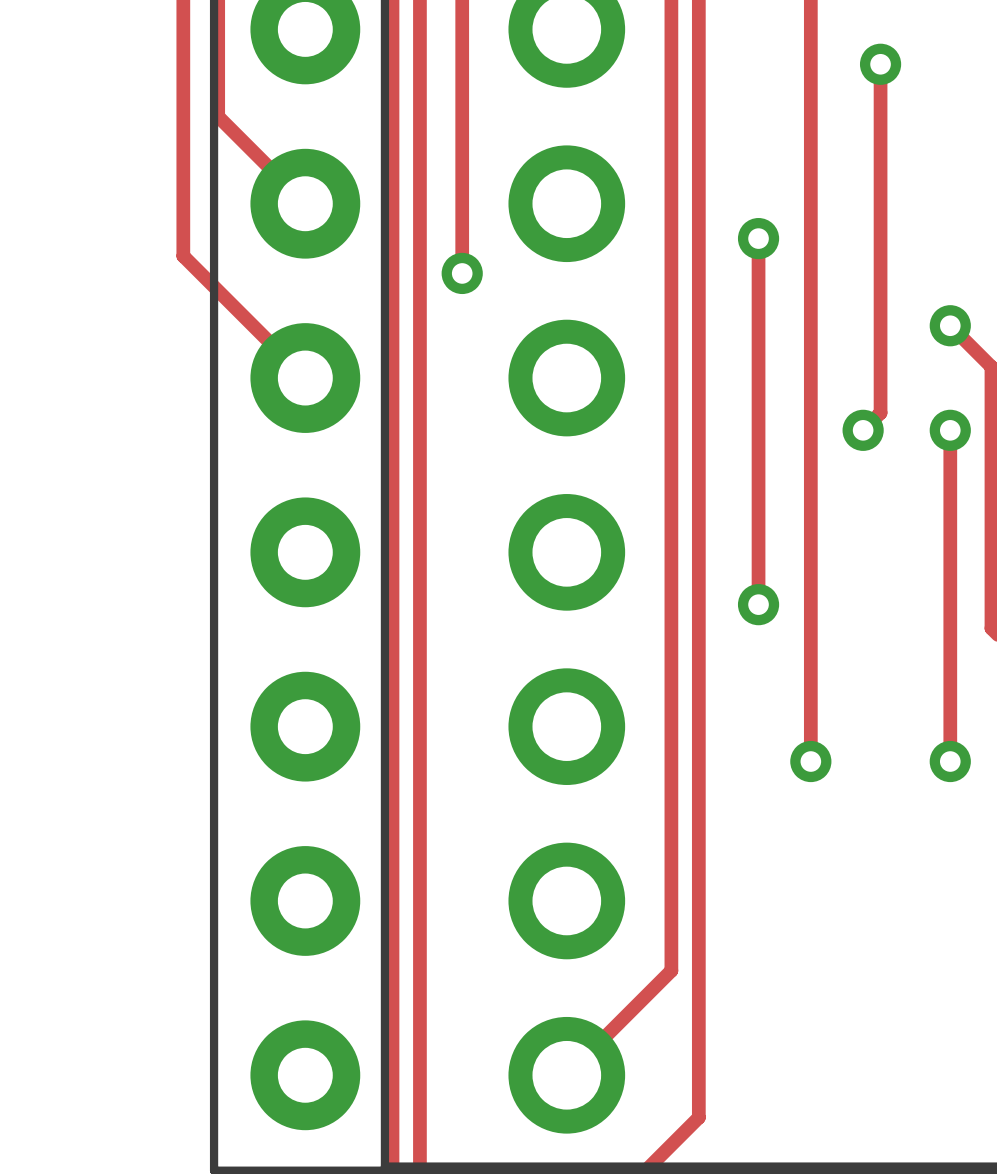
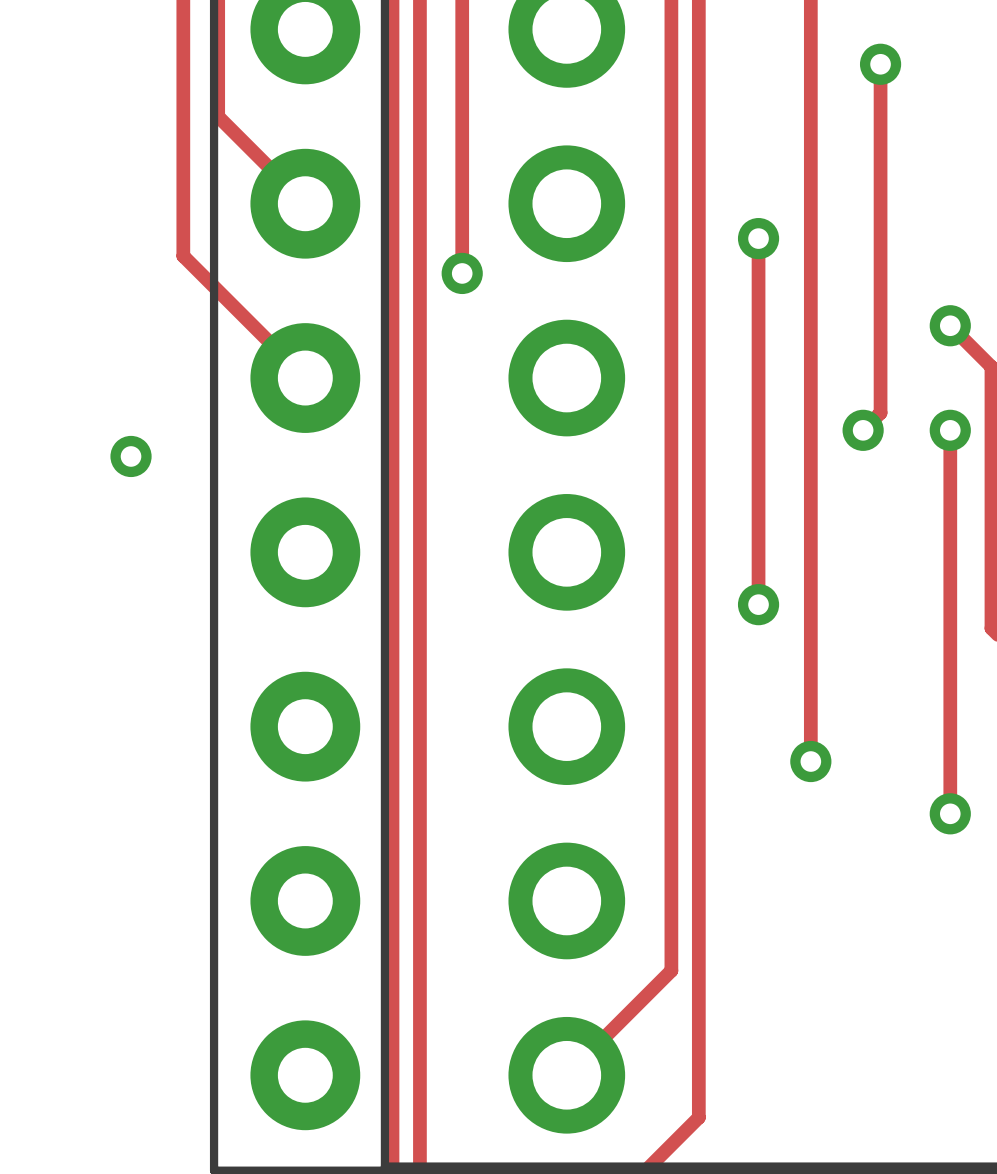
via: none -> (131, 456)
track: none -> (950, 761) (950, 813)
via position: (950, 761) -> (950, 813)

